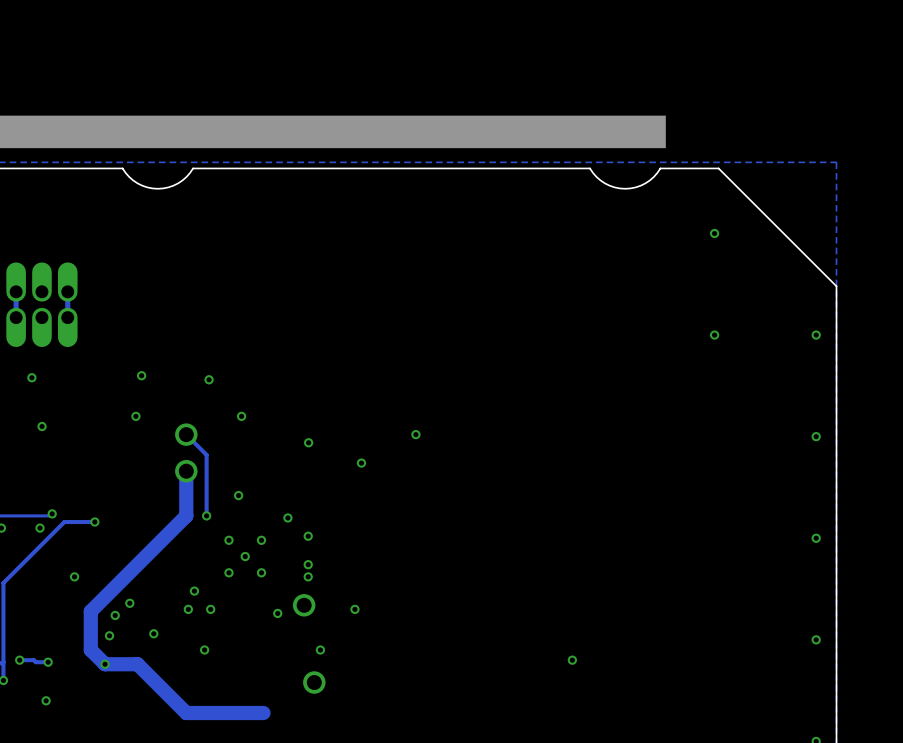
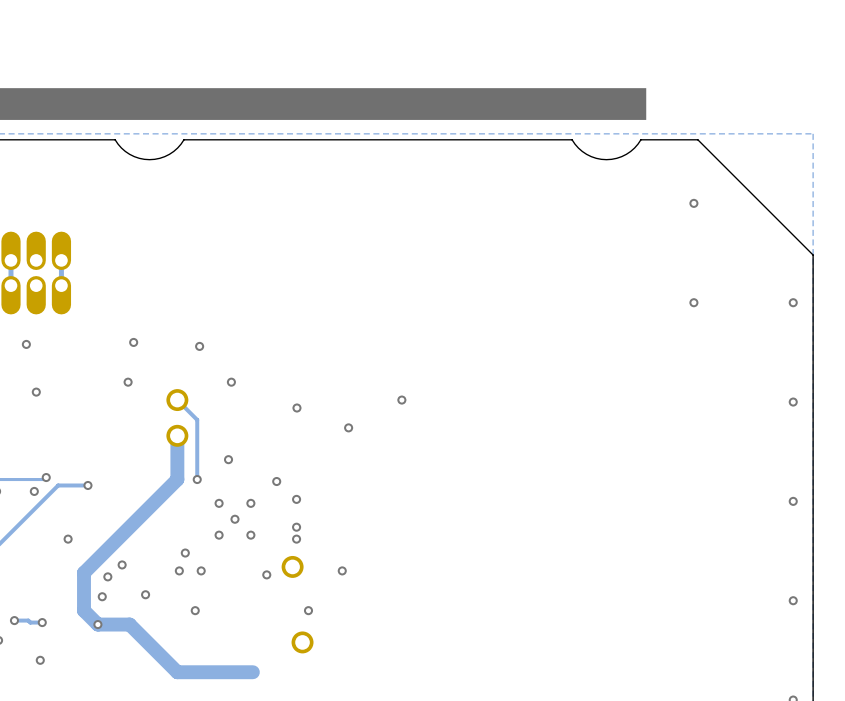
via: (572, 660) -> none

